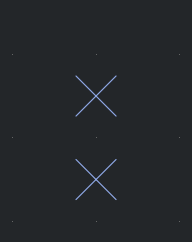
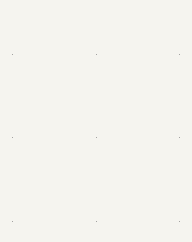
no-connect mark: (96, 96) -> none
no-connect mark: (96, 179) -> none

